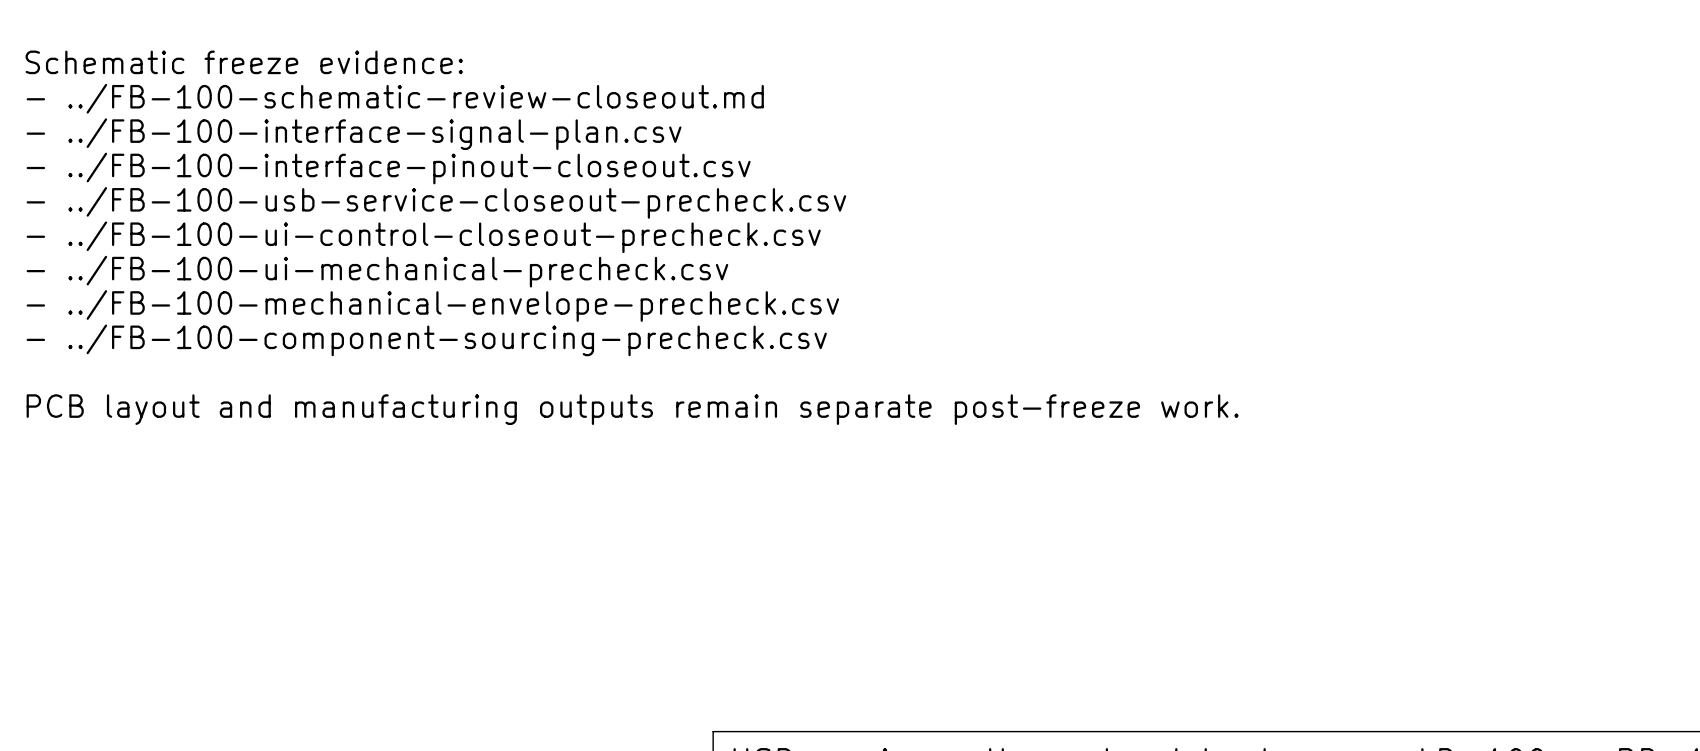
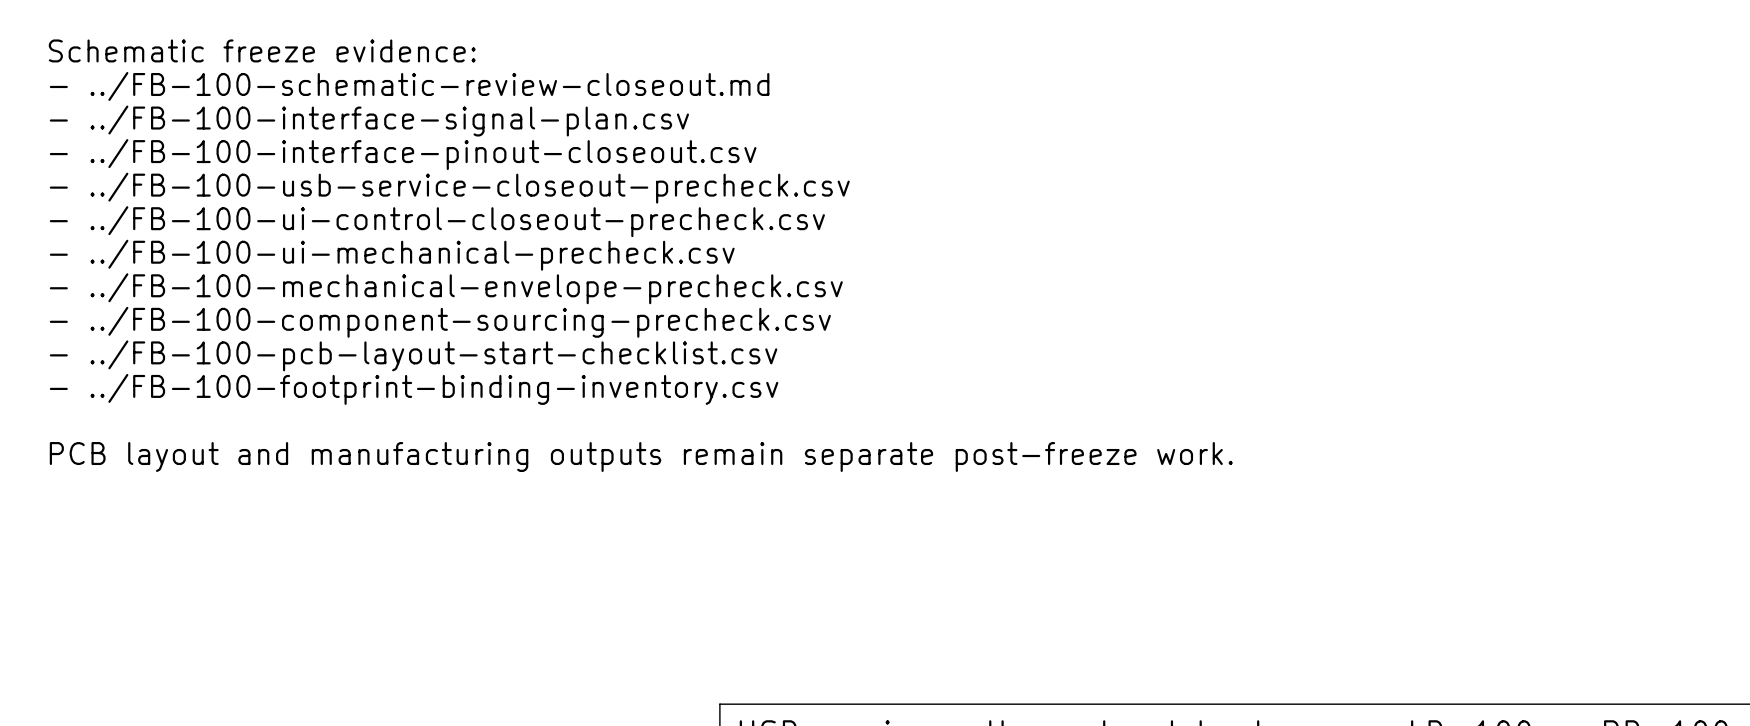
text: none -> - ../FB-100-pcb-layout-start-checklist.csv (413, 355)
text: PCB layout and manufacturing outputs remain separate post-freeze work. (632, 409) -> - ../FB-100-footprint-binding-inventory.csv (414, 389)
text: none -> PCB layout and manufacturing outputs remain separate post-freeze work. (641, 456)

